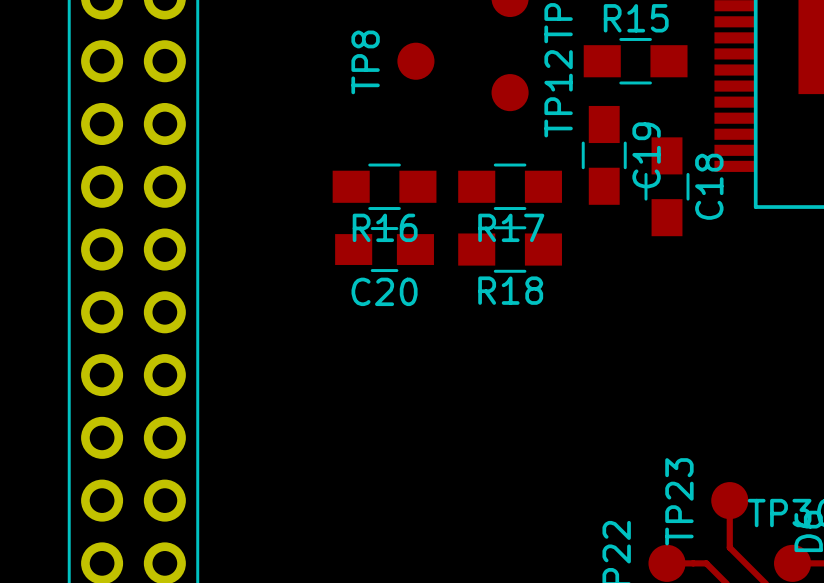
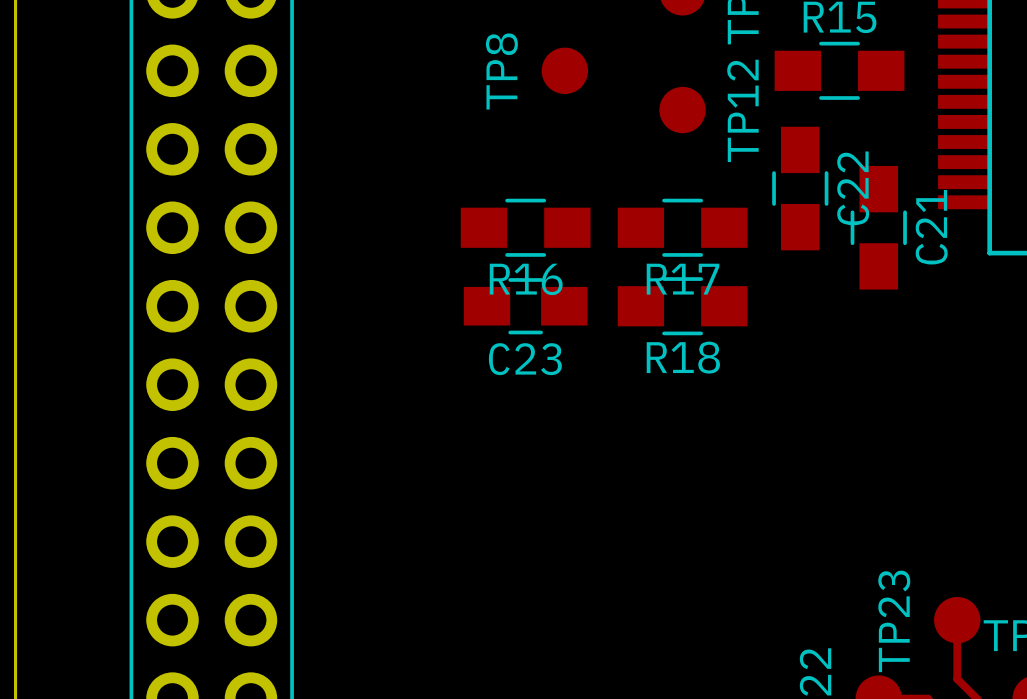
C19 name: C19 (646, 155) -> C22 (853, 188)
C18 name: C18 (709, 186) -> C21 (931, 227)
C20 name: C20 (384, 291) -> C23 (525, 359)

